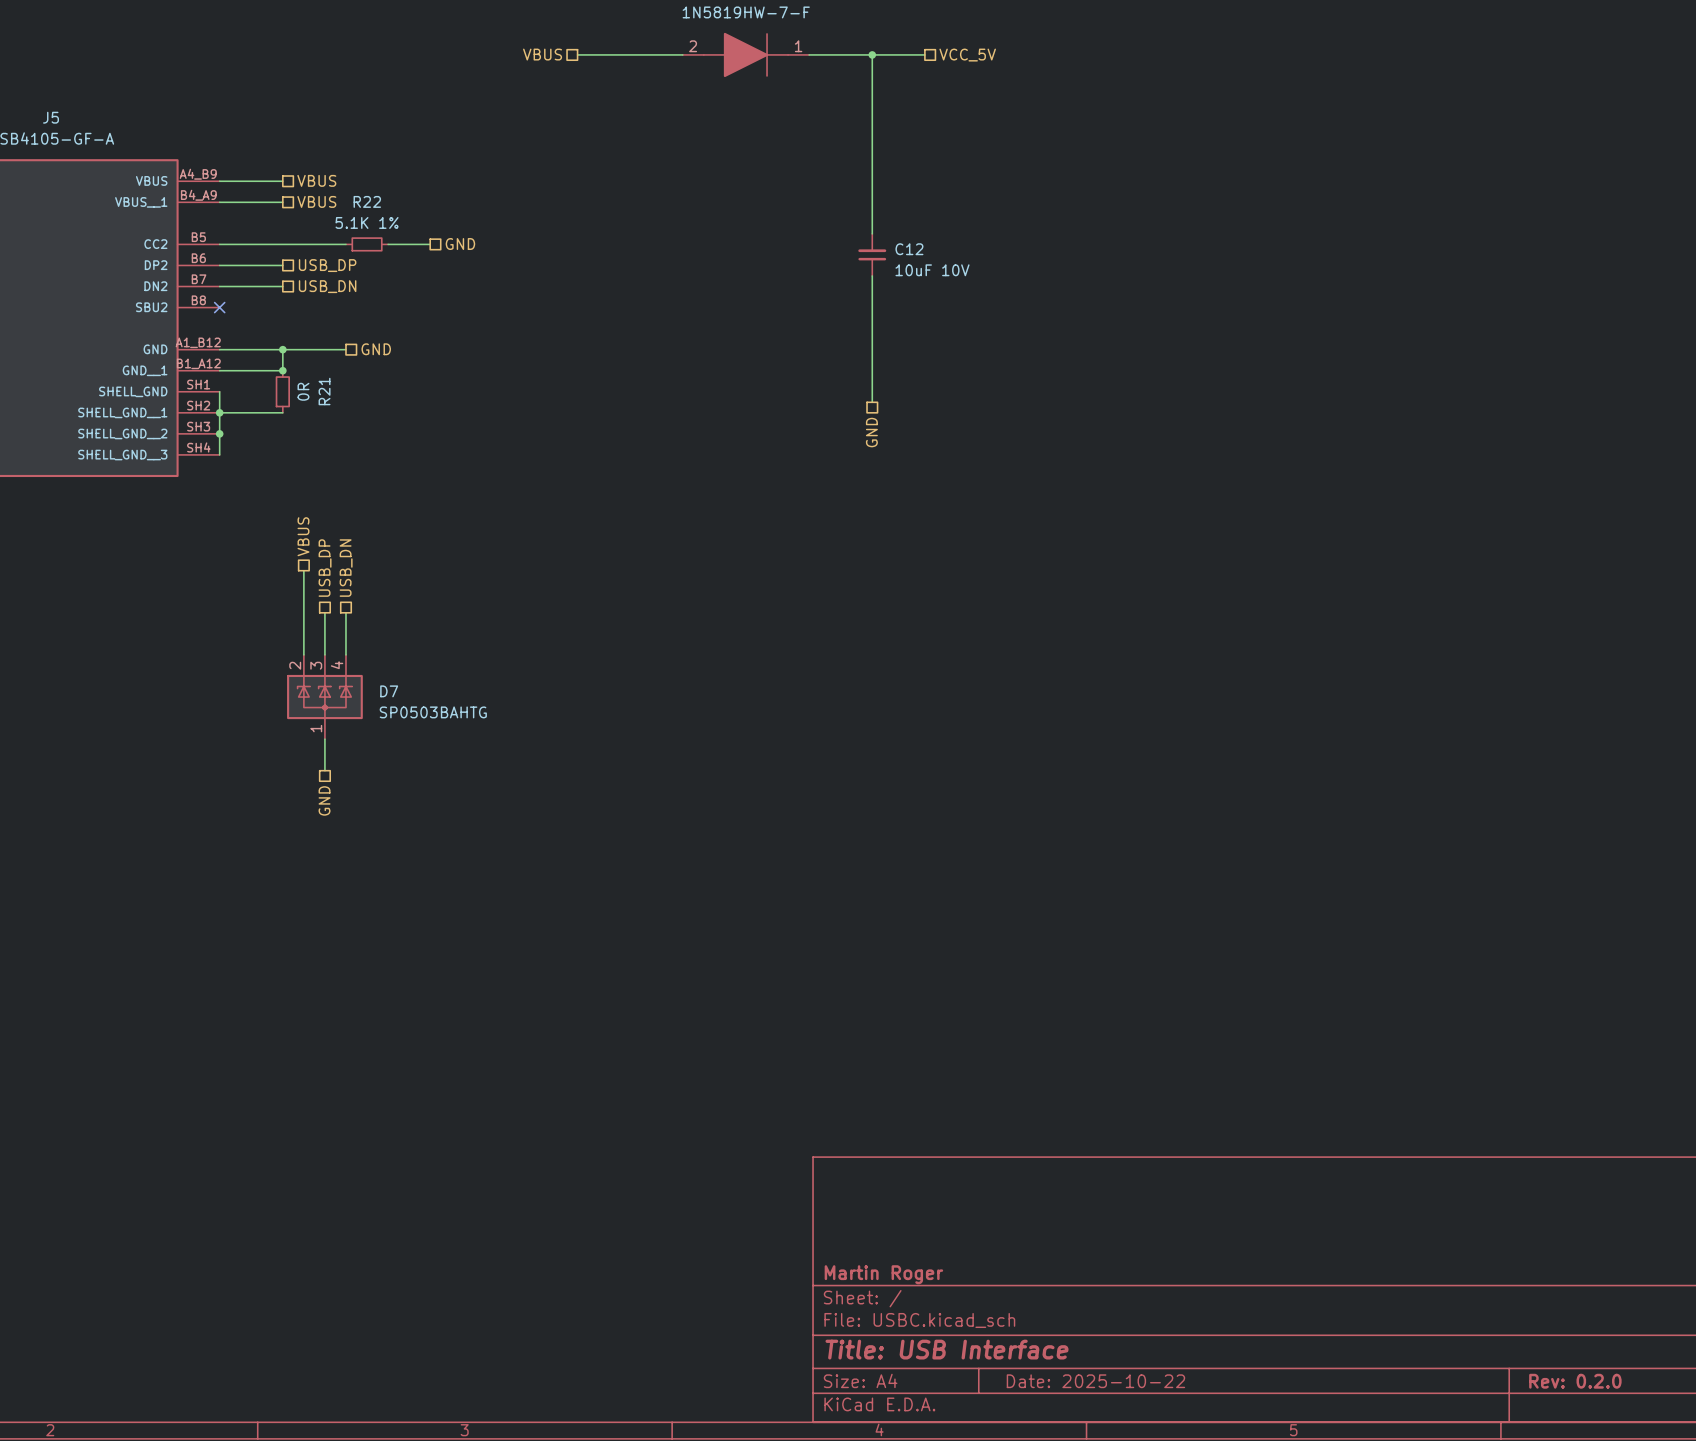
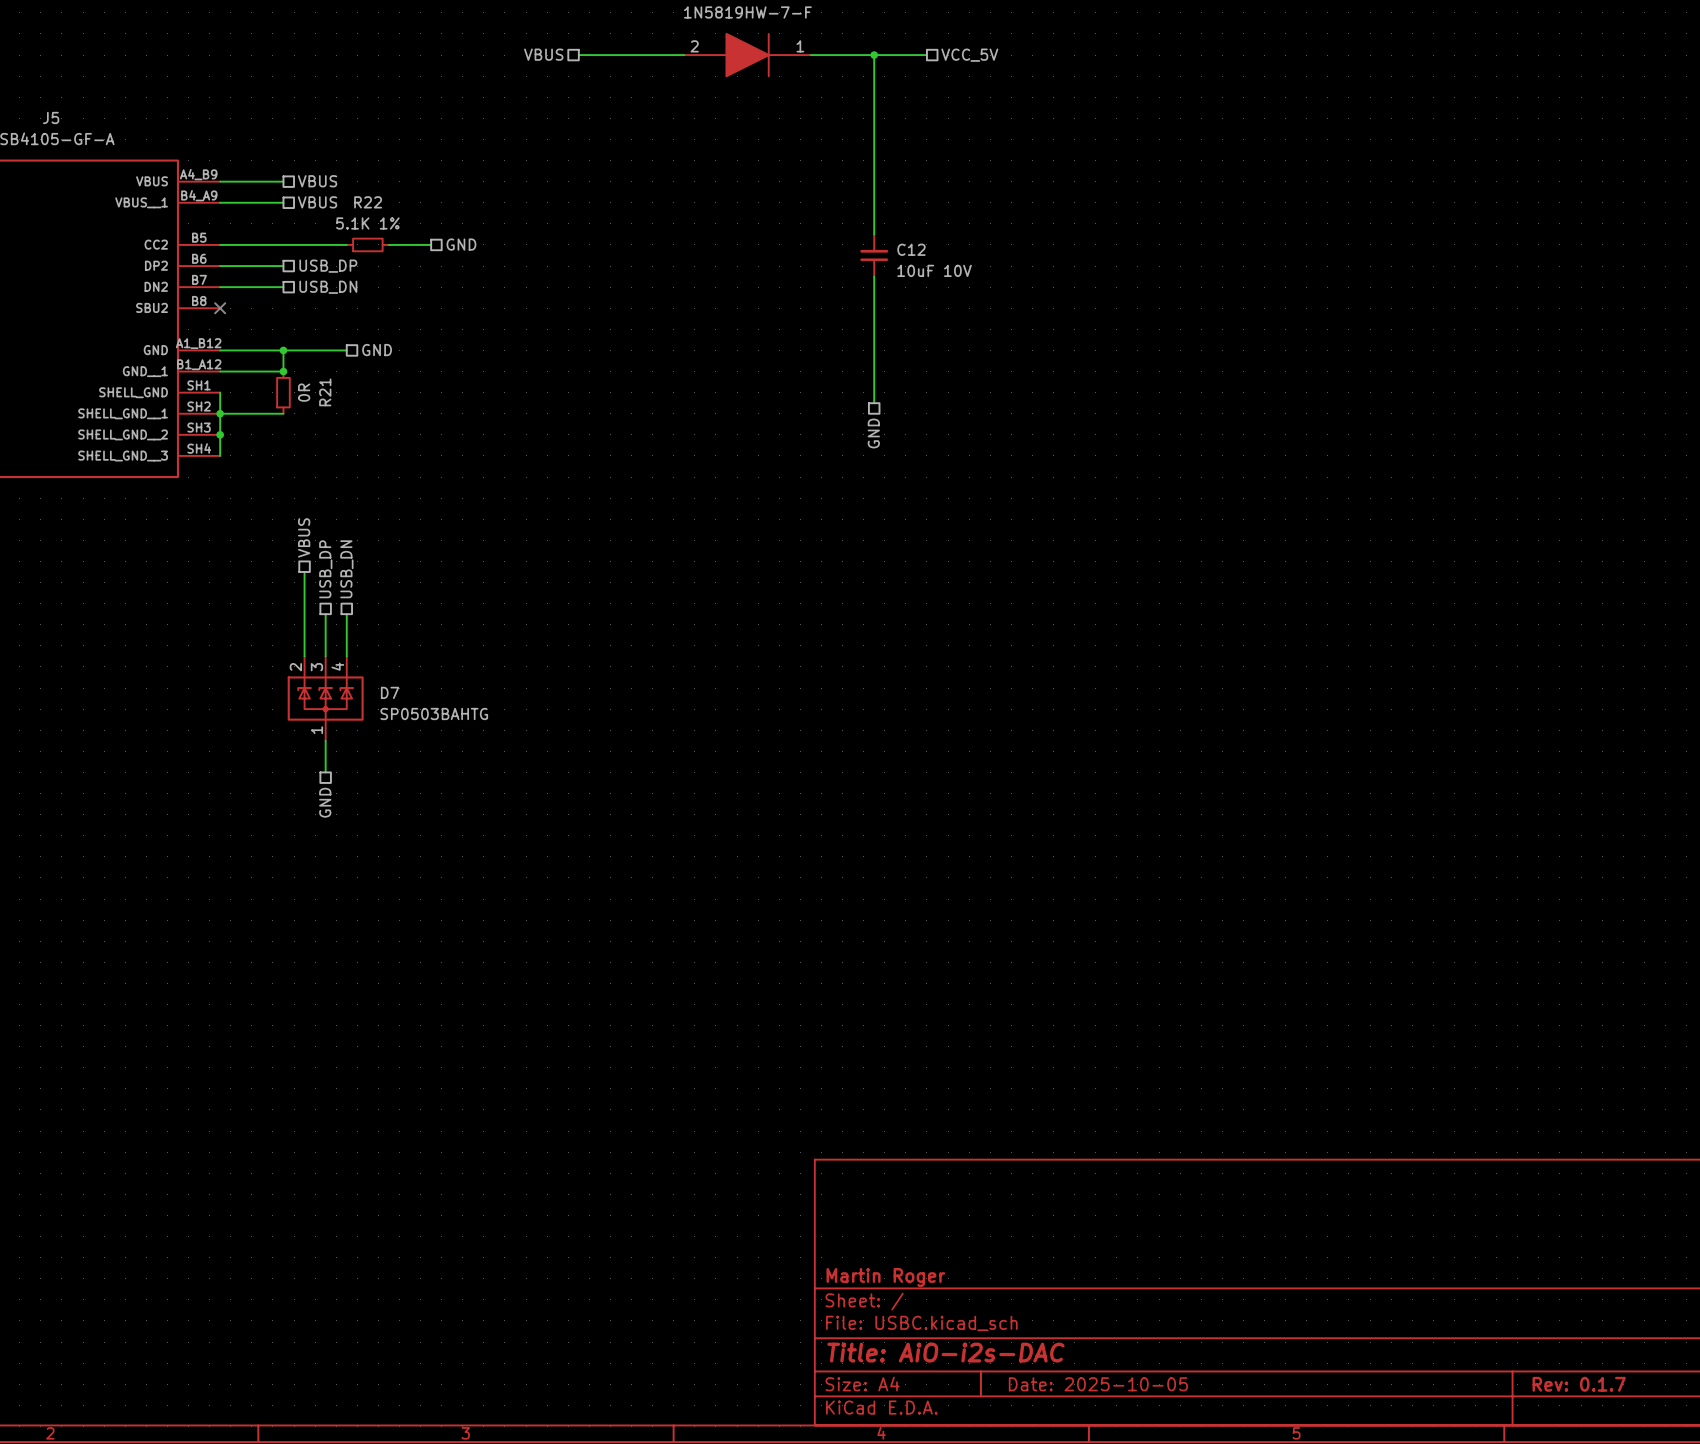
title block: Title: USB Interface (947, 1349) -> Title: AiO-i2s-DAC (945, 1352)
title block: Date: 2025-10-22 (1095, 1381) -> Date: 2025-10-05 (1098, 1384)
title block: Rev: 0.2.0 (1575, 1381) -> Rev: 0.1.7 (1579, 1384)

